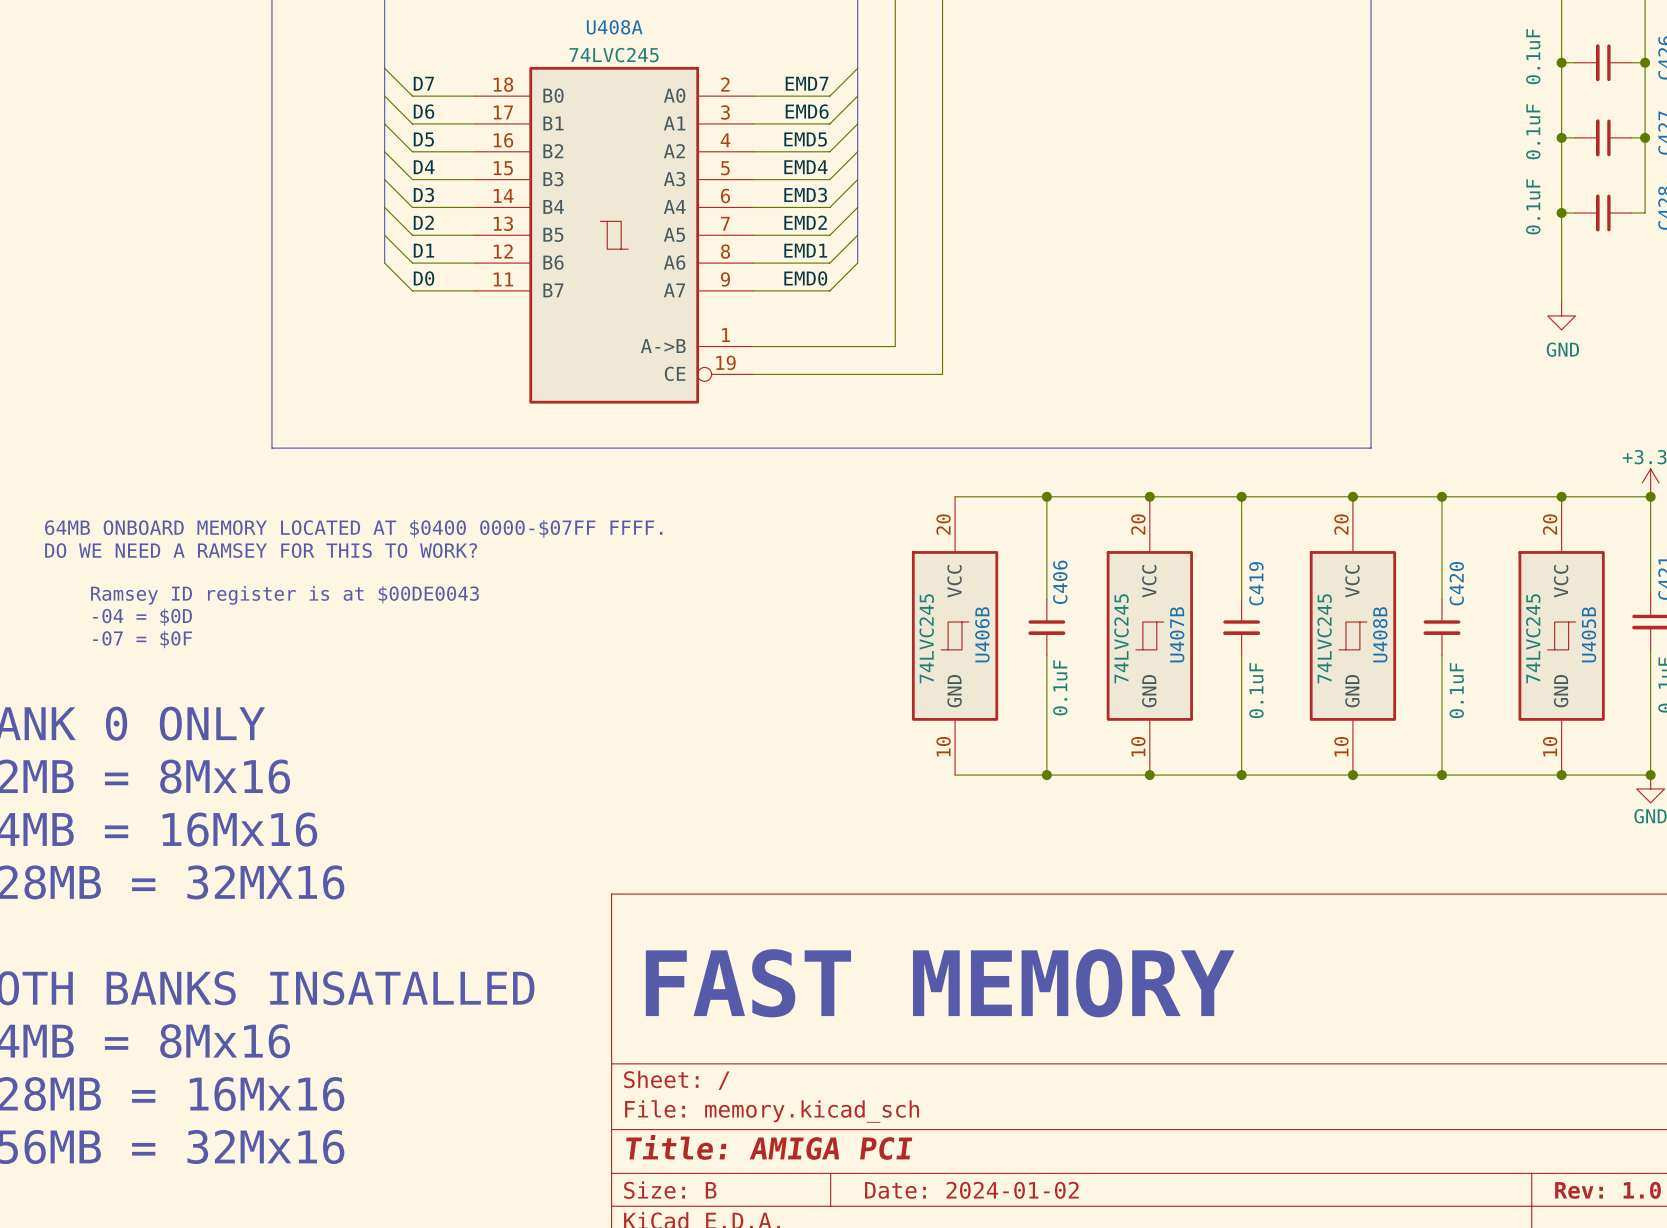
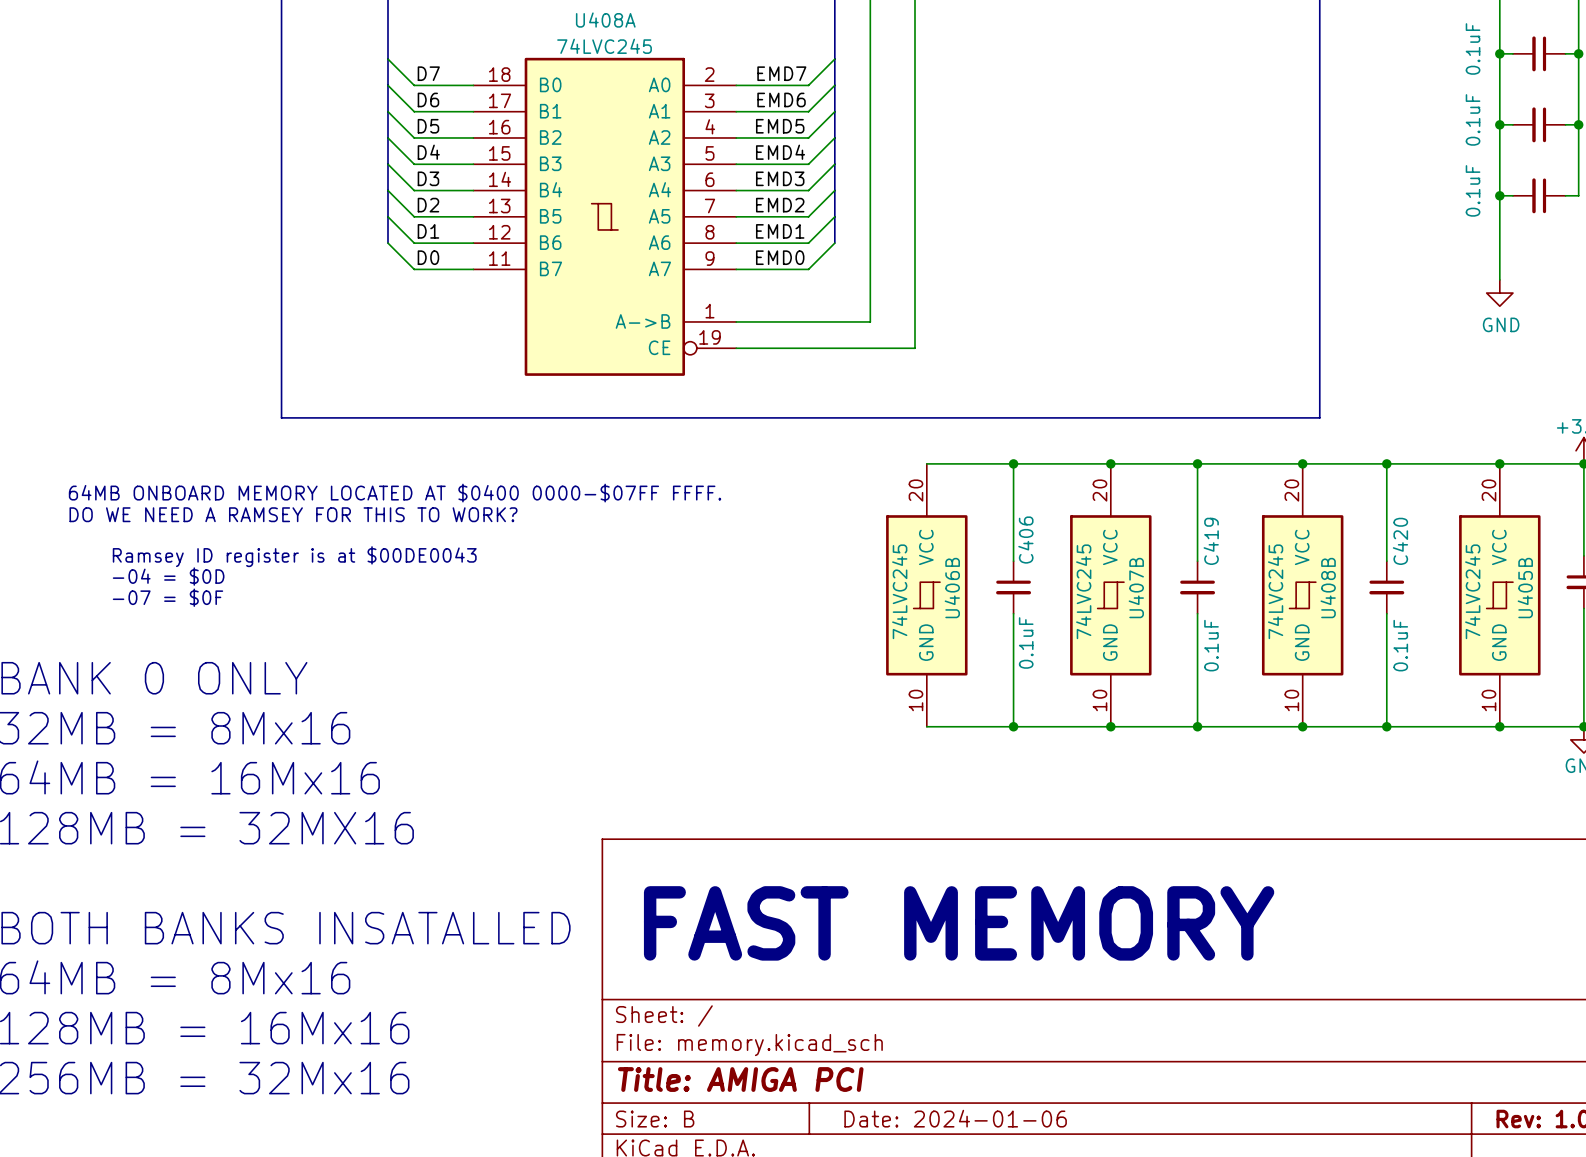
title block: Date: 2024-01-02 (971, 1190) -> Date: 2024-01-06 (955, 1118)

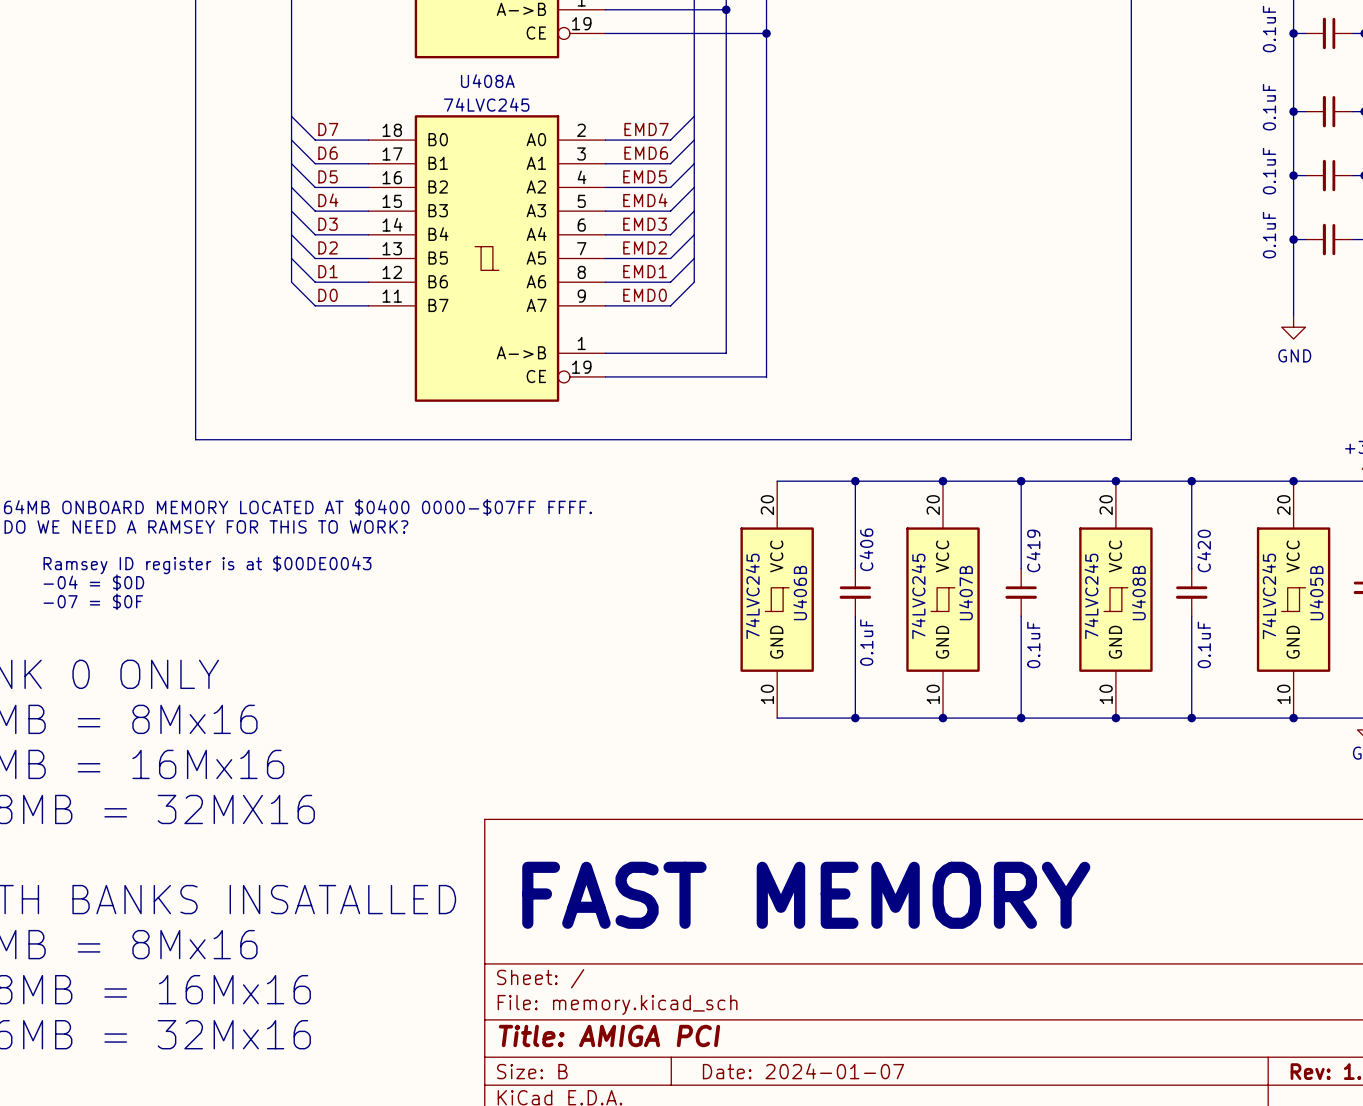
title block: Date: 2024-01-06 (955, 1118) -> Date: 2024-01-07 (803, 1071)

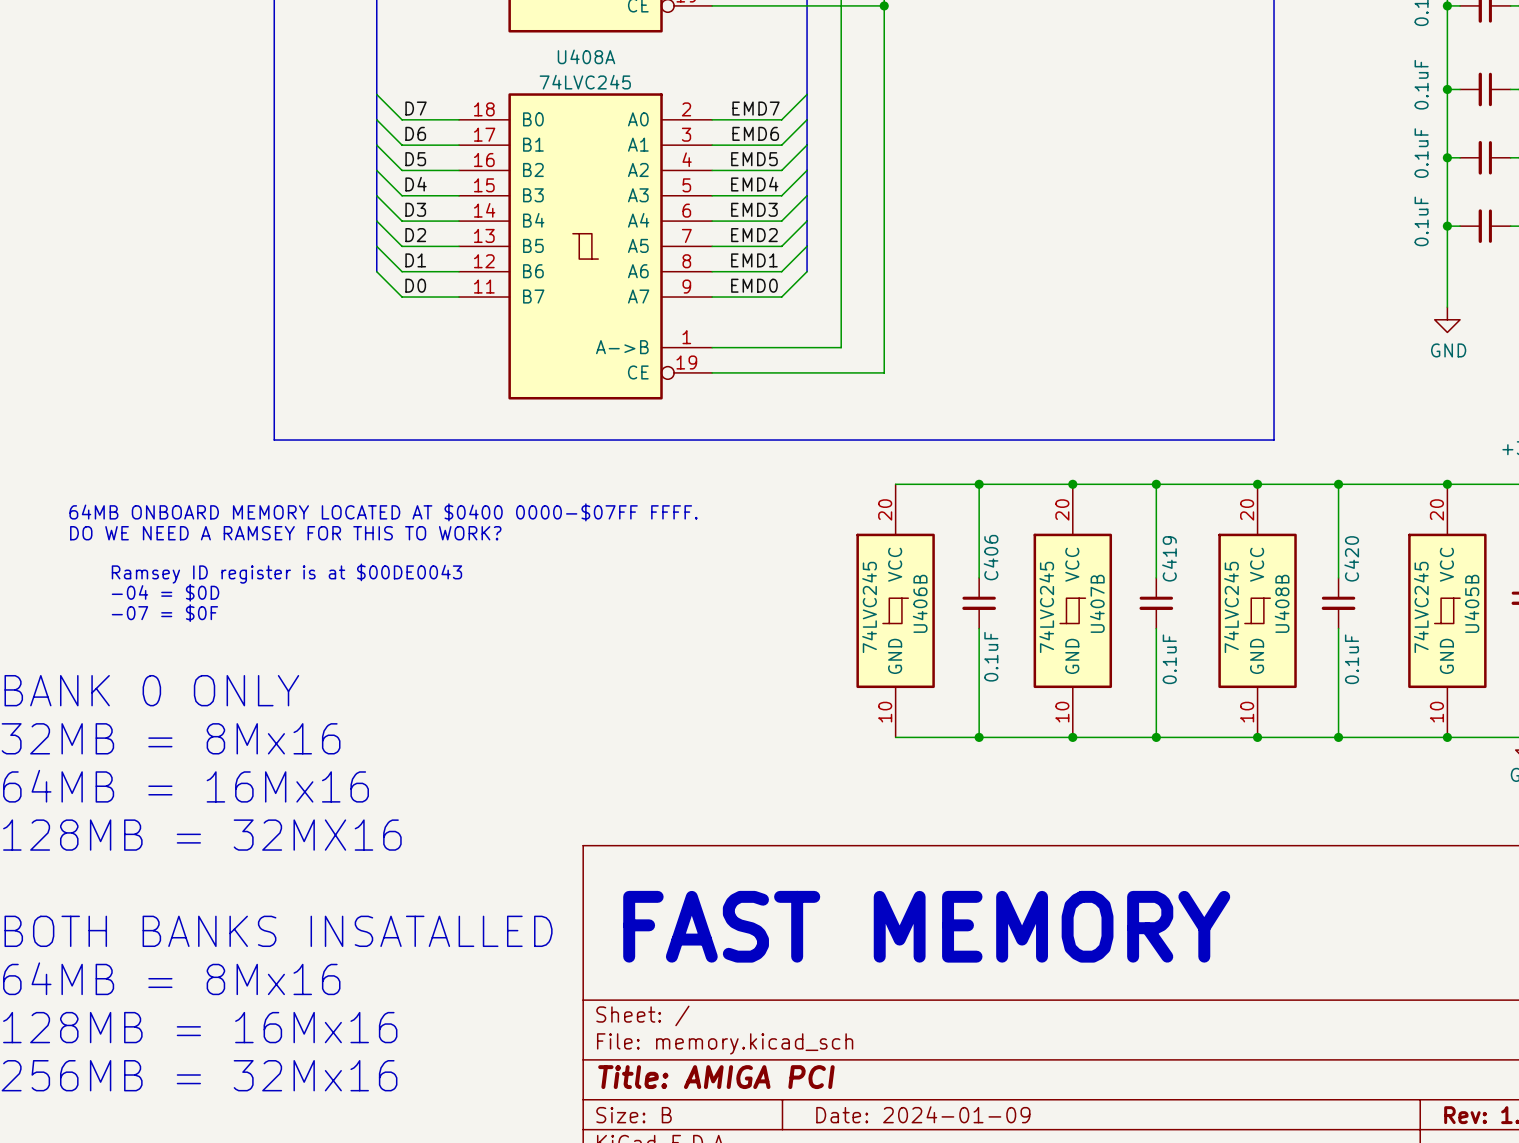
title block: Date: 2024-01-07 (803, 1071) -> Date: 2024-01-09 (923, 1114)

